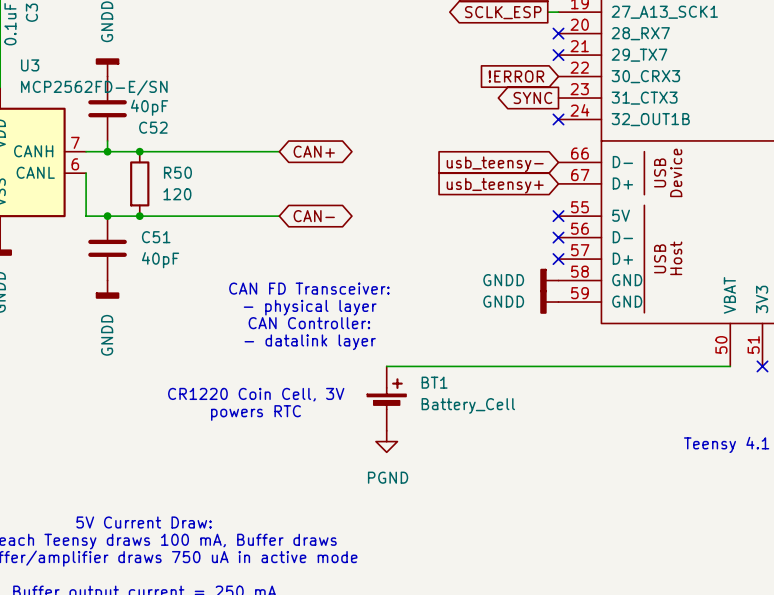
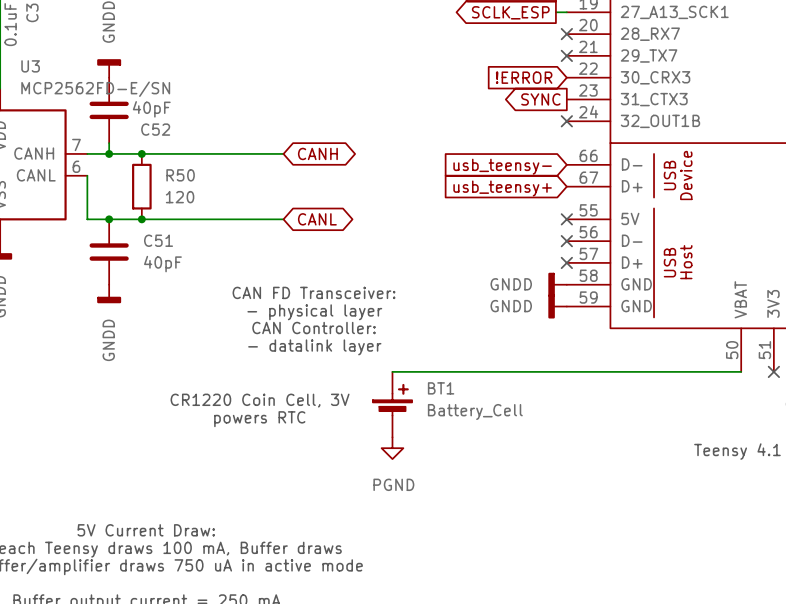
global label: CAN+ (314, 151) -> CANH (317, 153)
global label: CAN- (314, 216) -> CANL (317, 219)

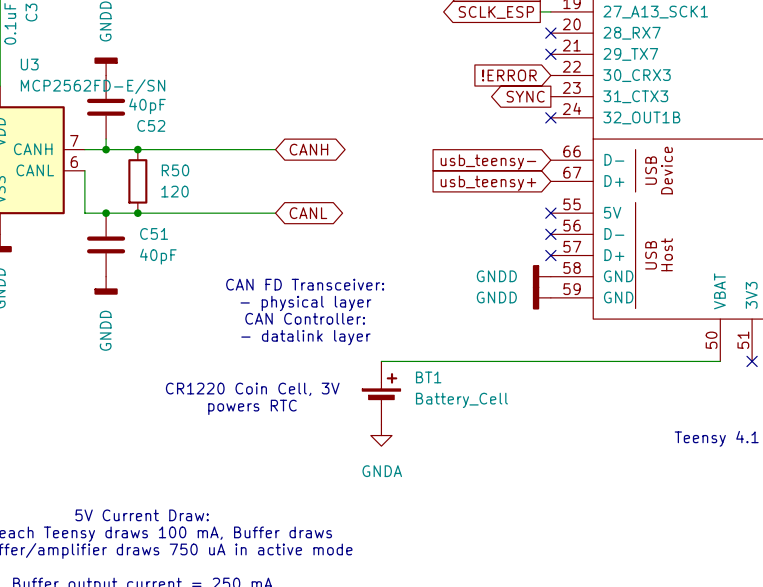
power symbol: PGND (392, 448) -> GNDA (381, 435)

